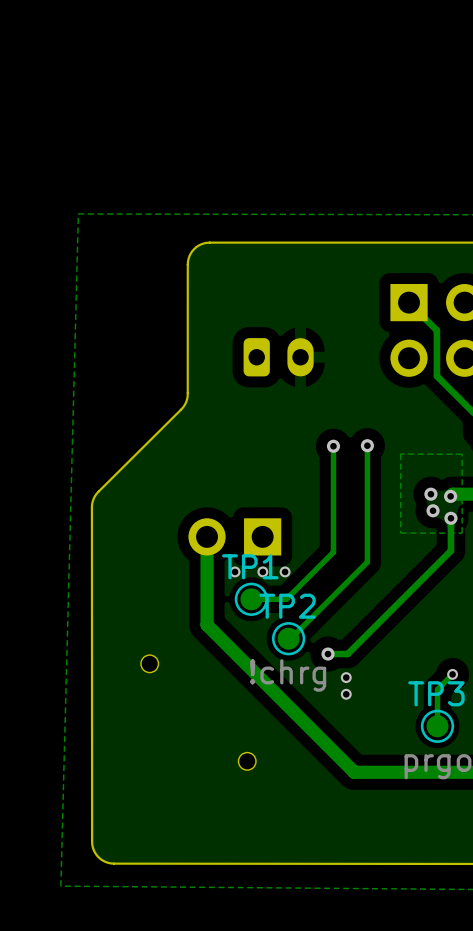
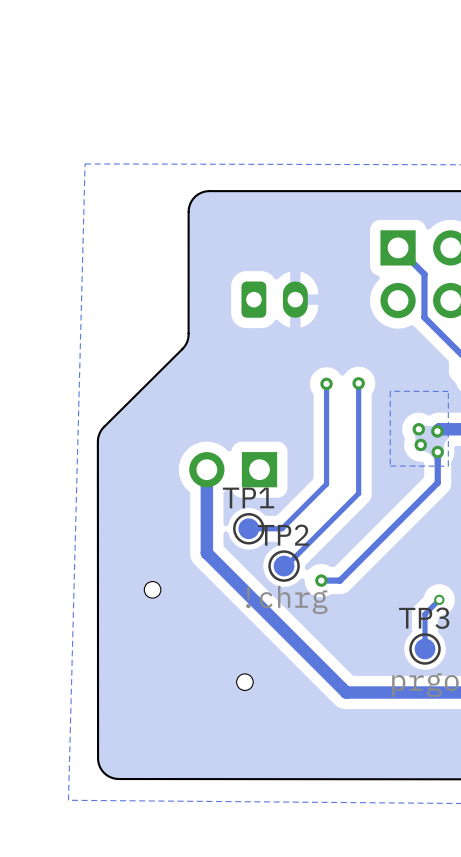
via: (235, 571) -> none
via: (262, 571) -> none
via: (285, 571) -> none
via: (346, 677) -> none
via: (346, 694) -> none

